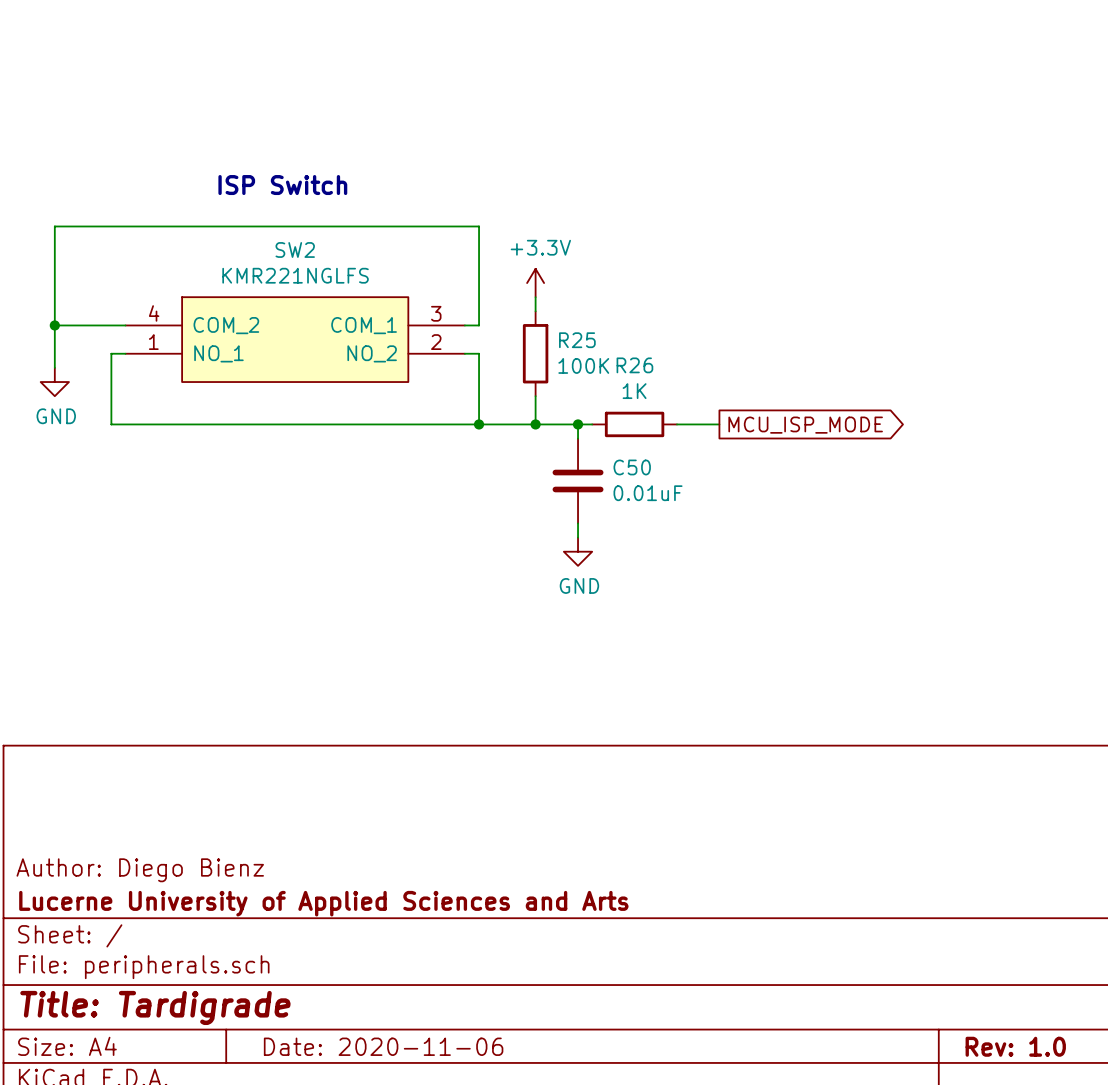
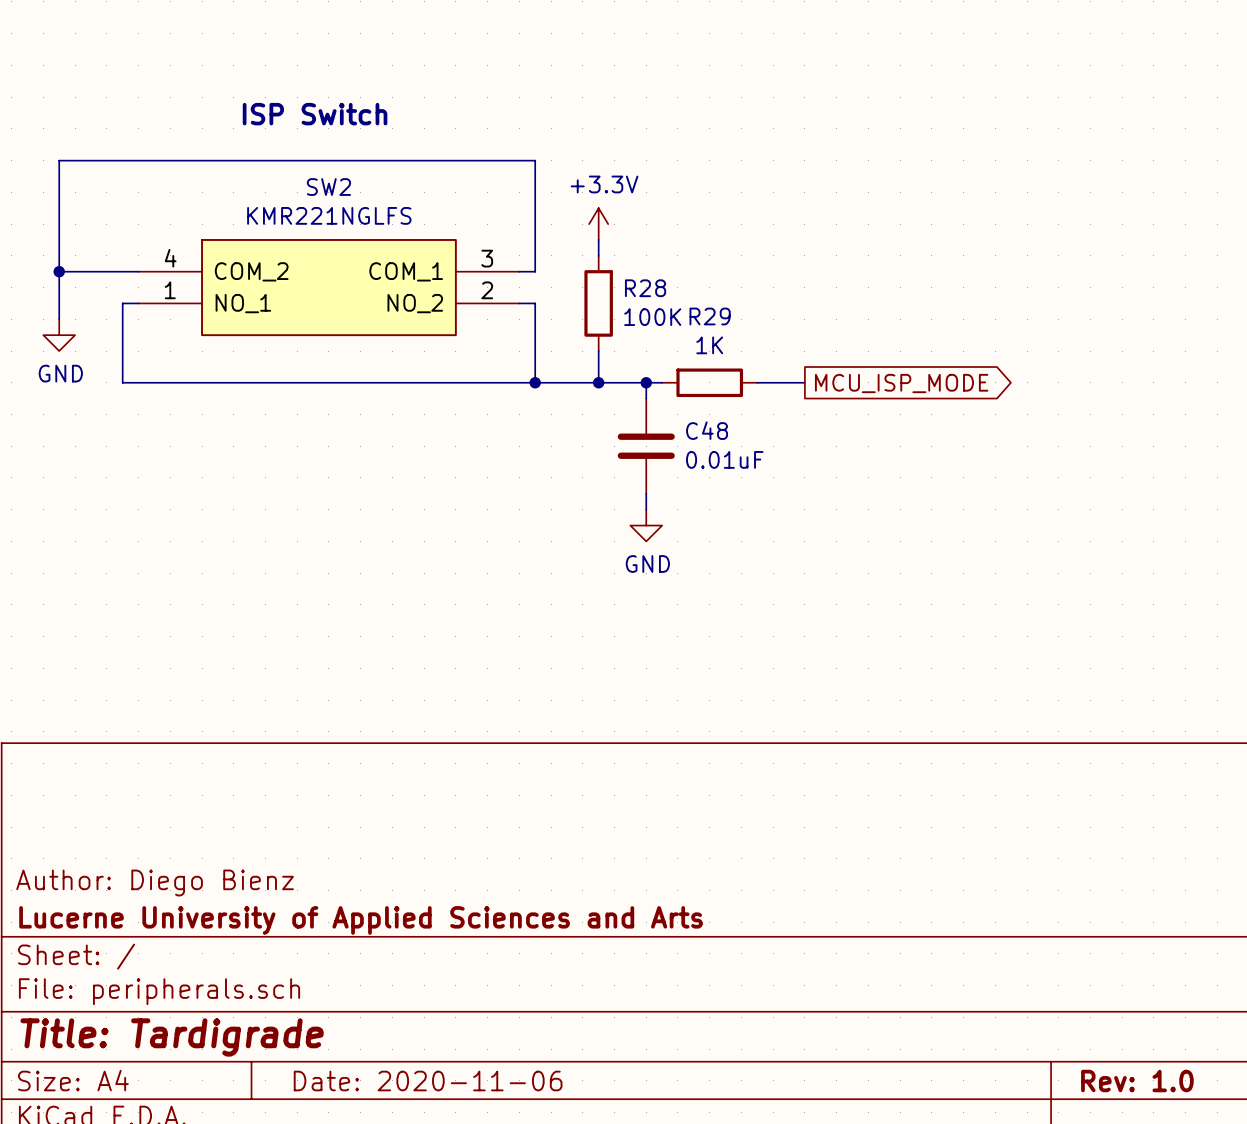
R25 name: R25 (577, 340) -> R28 (645, 288)
R26 name: R26 (634, 365) -> R29 (710, 316)
C50 name: C50 (632, 467) -> C48 (707, 430)

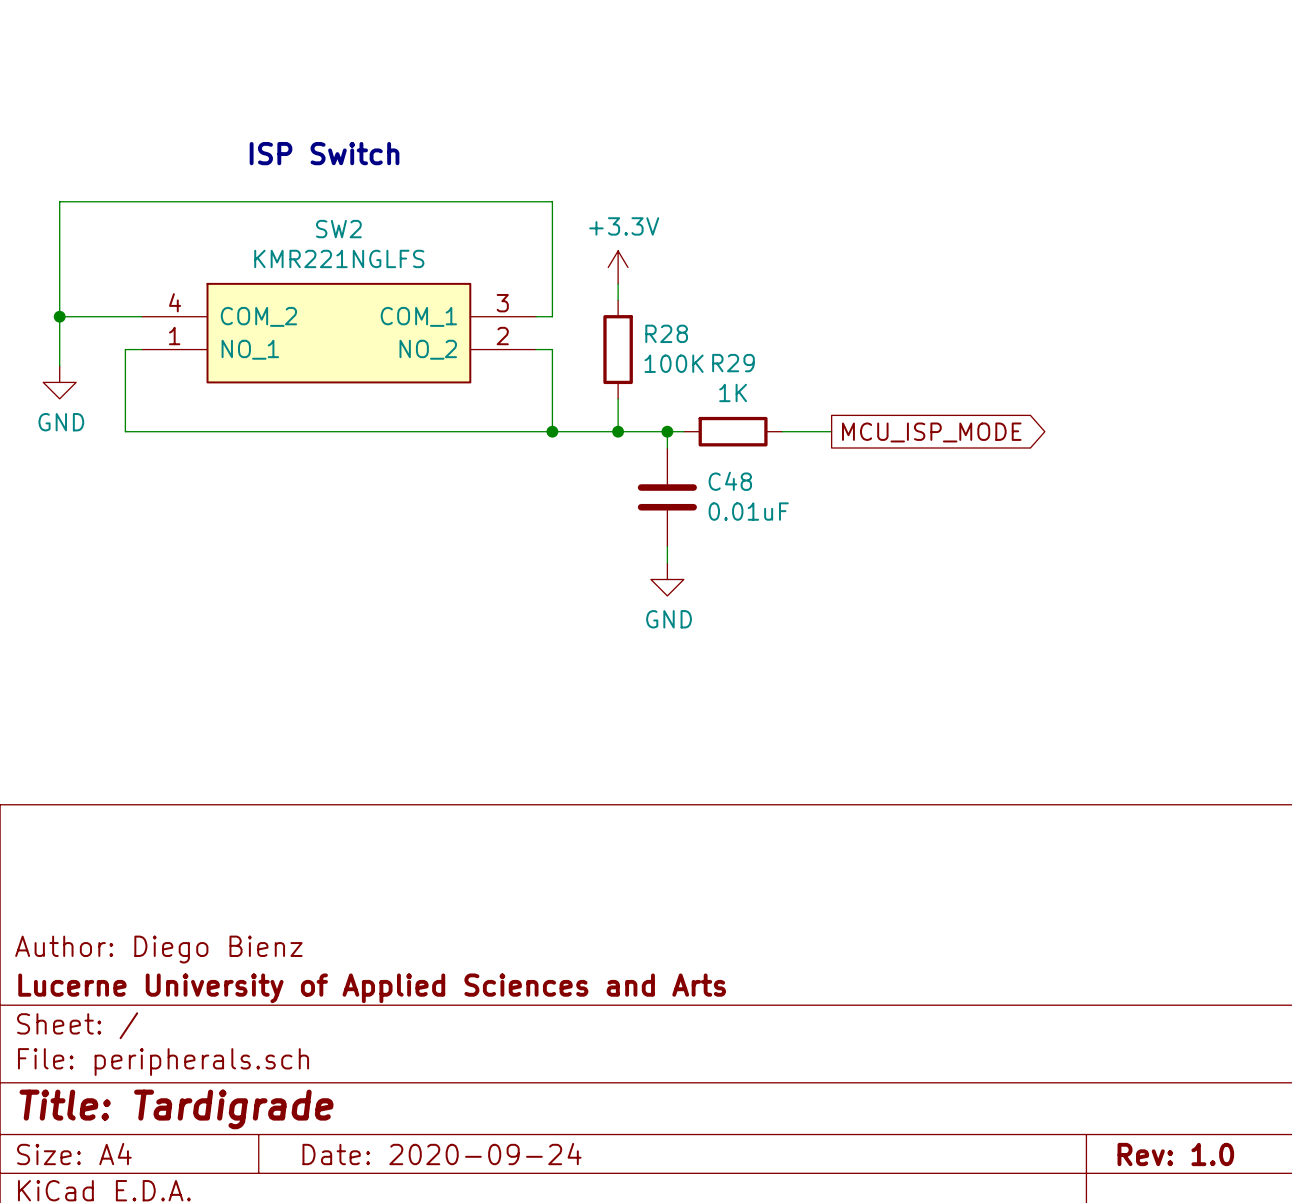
title block: Date: 2020-11-06 (428, 1081) -> Date: 2020-09-24 (442, 1154)

